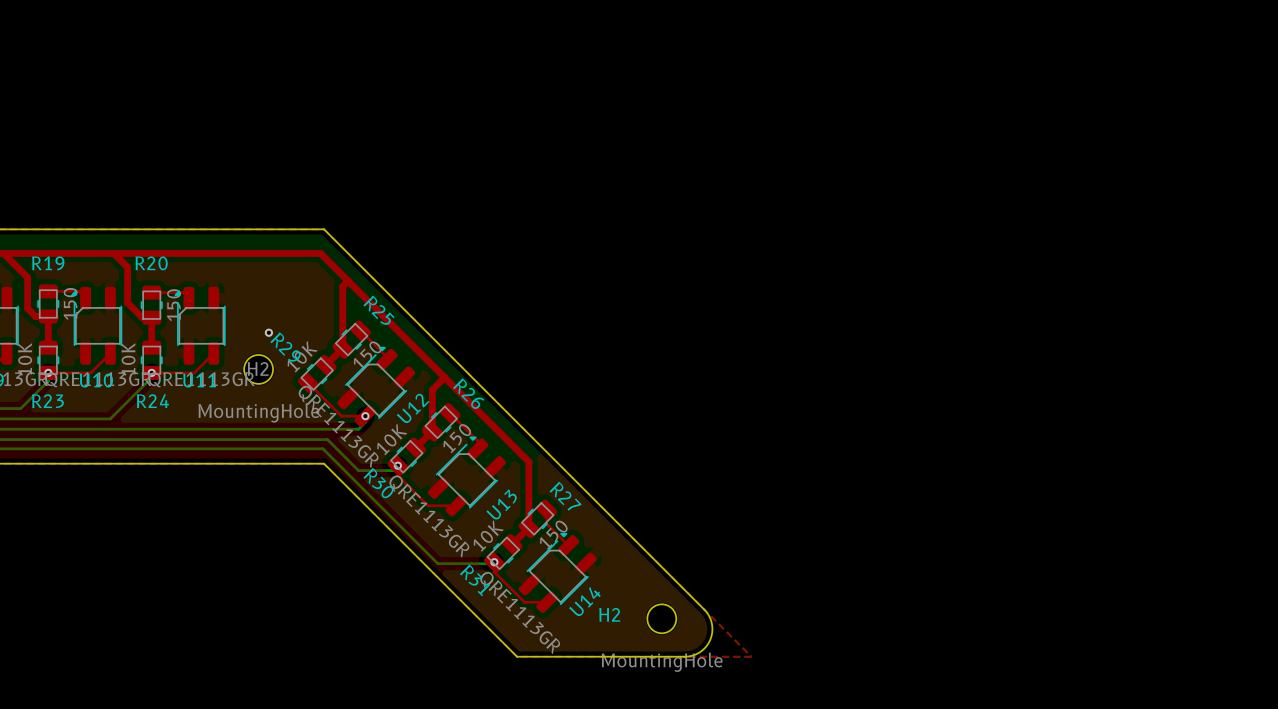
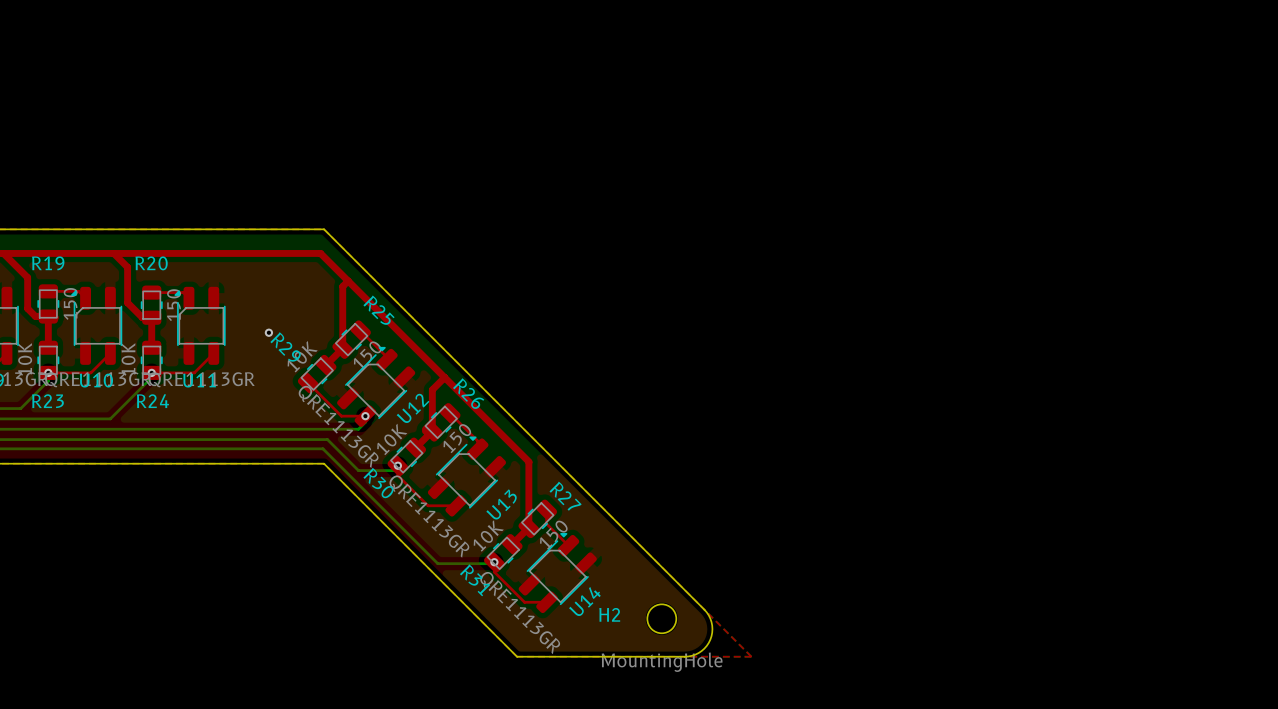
H2: MountingHole (258, 369) -> none

